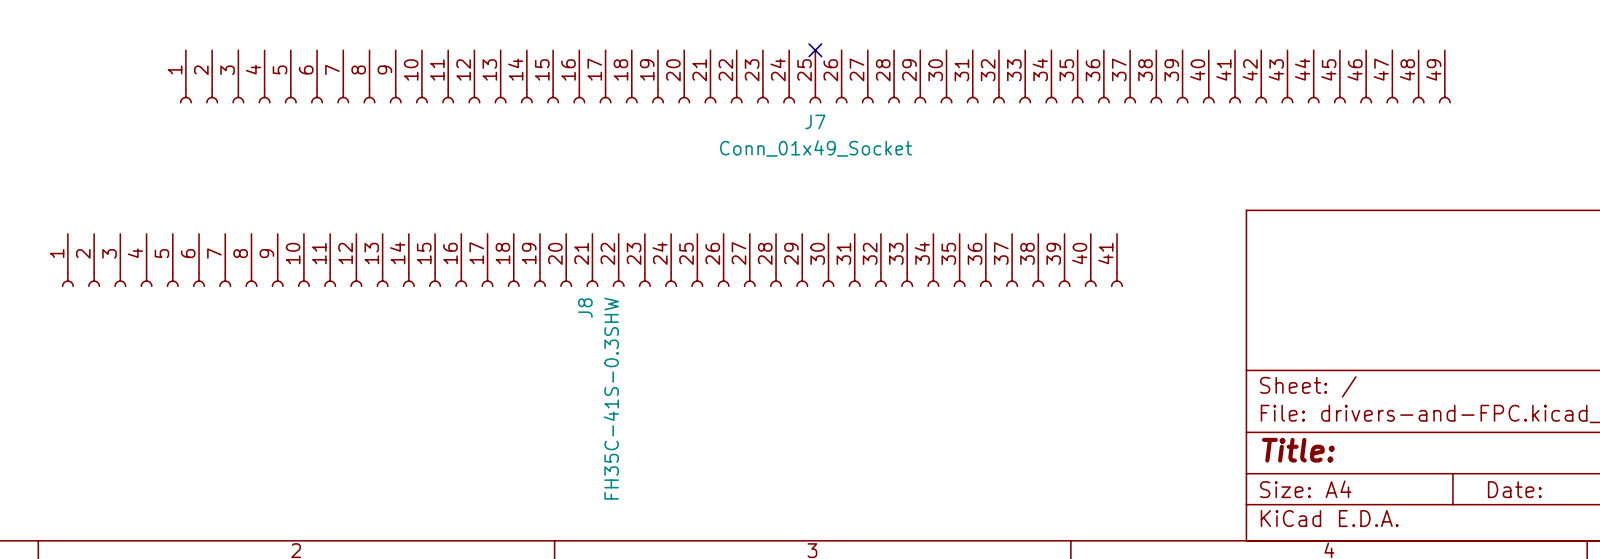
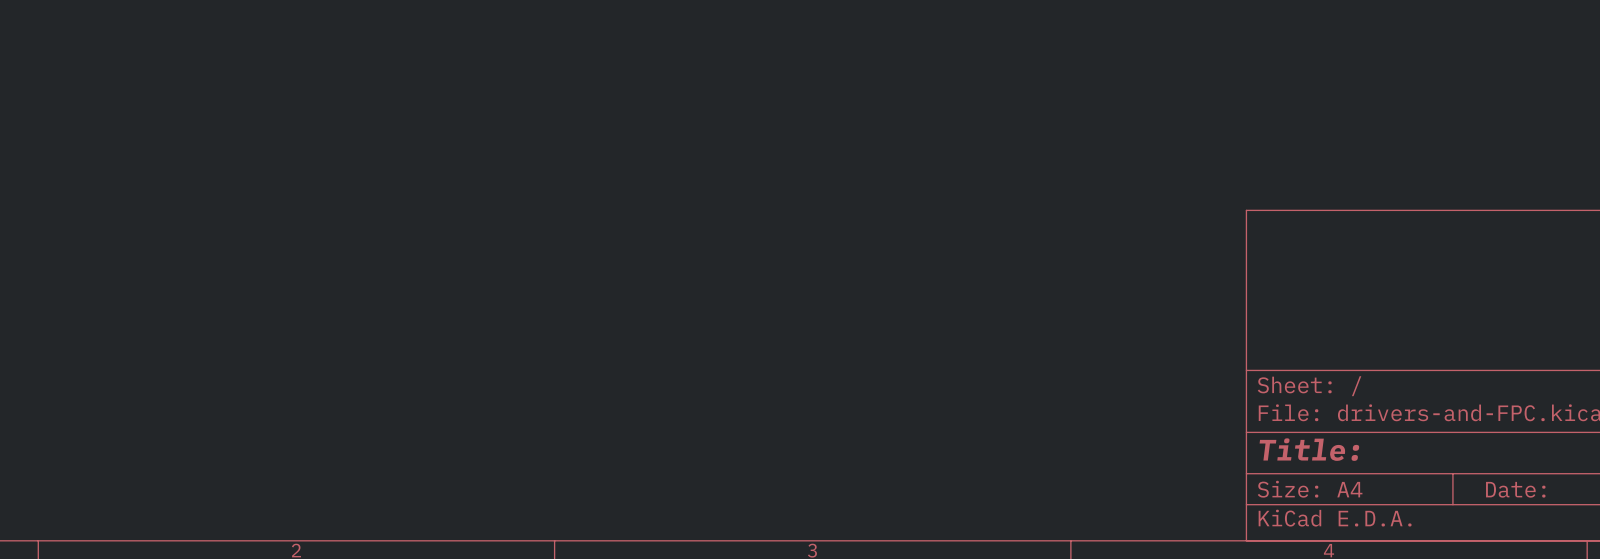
no-connect mark: (815, 50) -> none
J7: Conn_01x49_Socket (815, 76) -> none
J8: FH35C-41S-0.3SHW (592, 260) -> none

